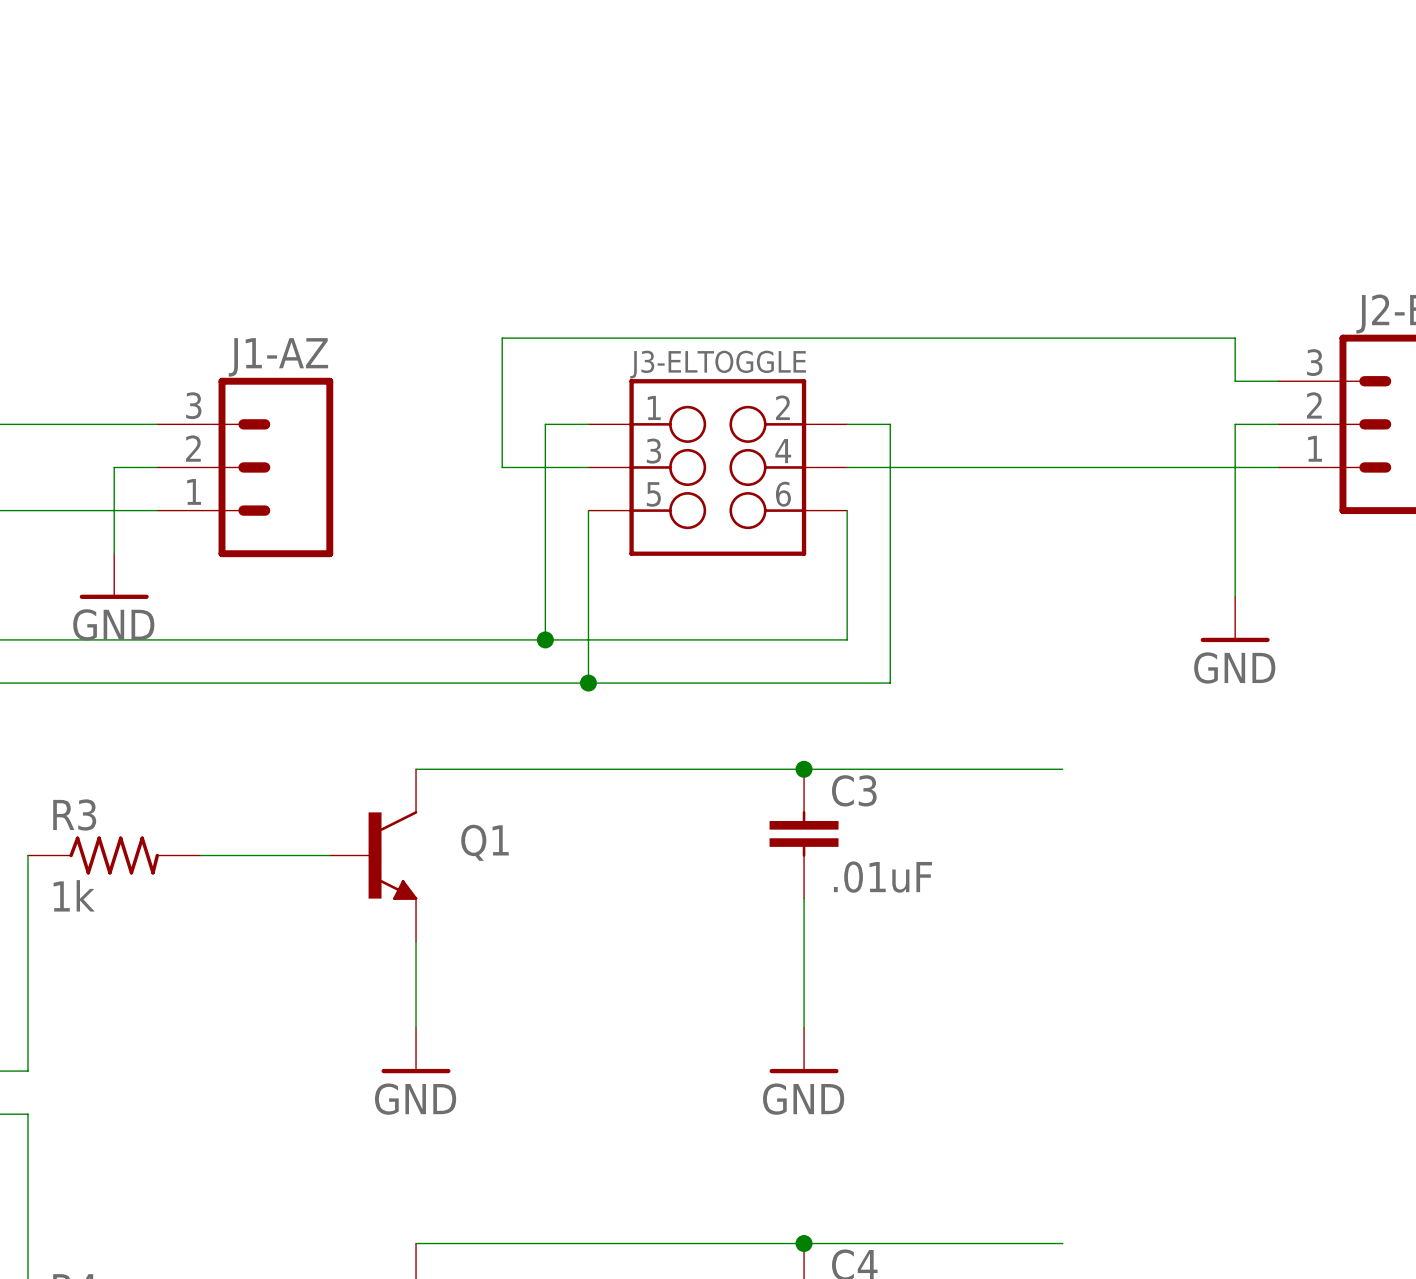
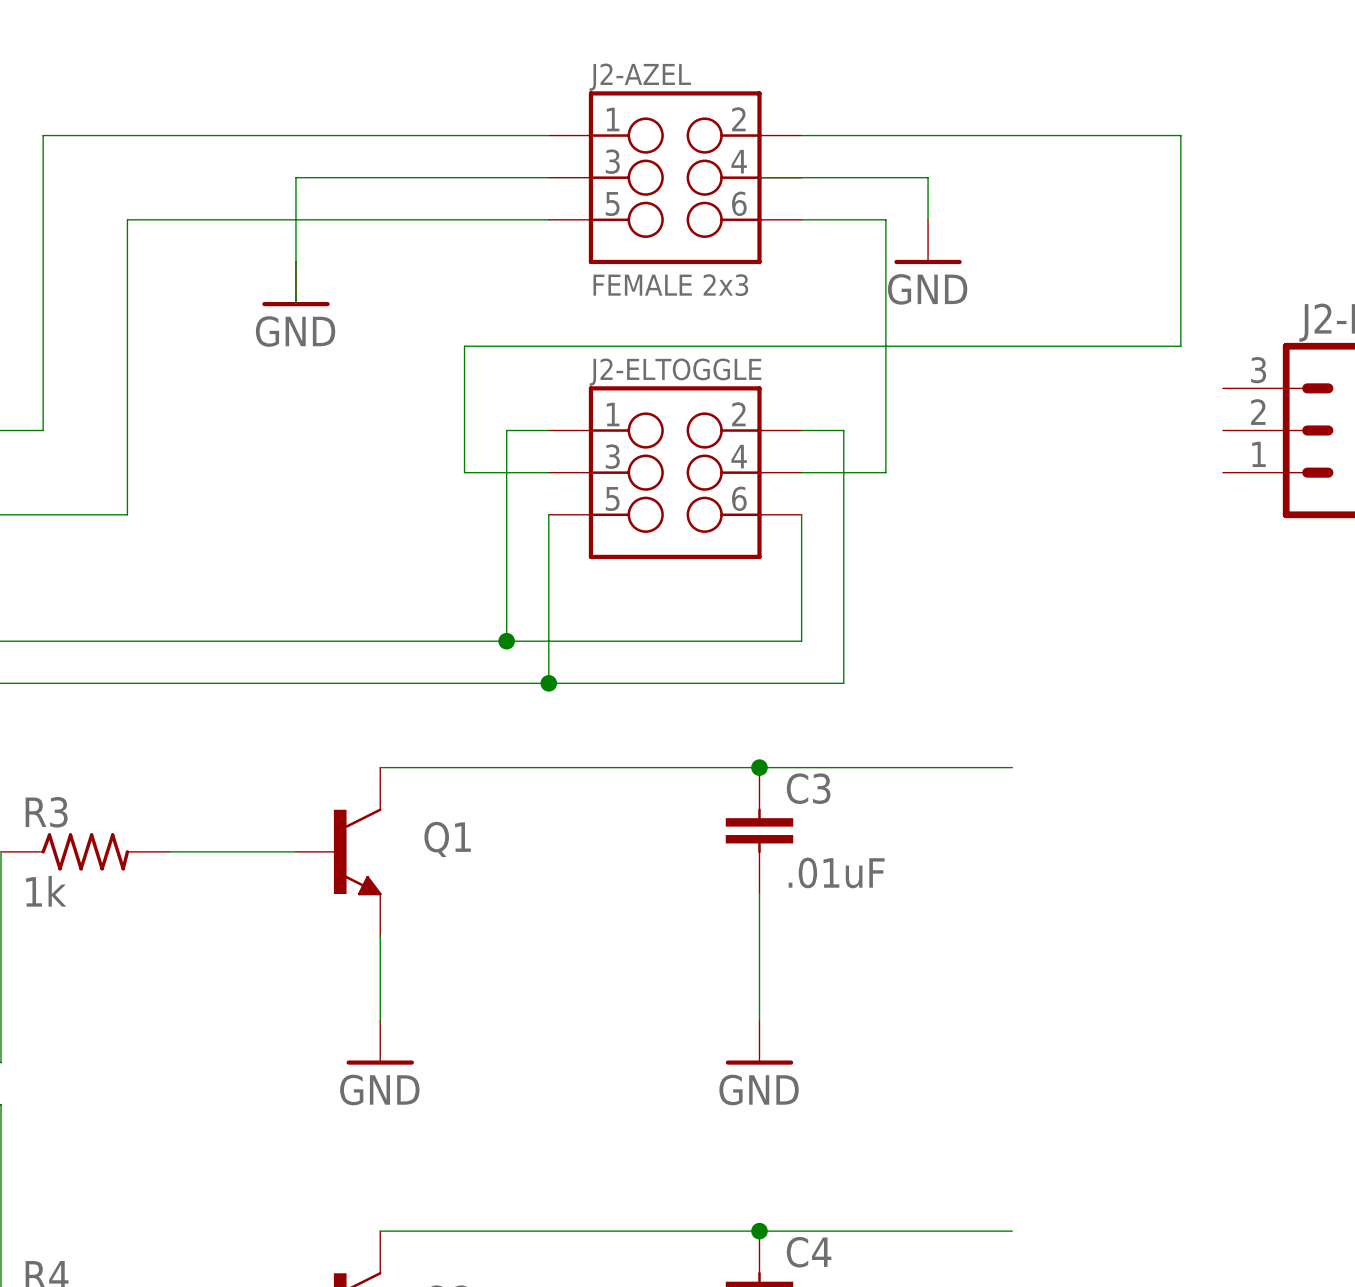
wire: none -> (548, 177) (295, 177) (295, 304)
J2-AZEL: none -> FEMALE 2x3 (675, 177)
wire: none -> (759, 177) (928, 177) (928, 219)
wire: none -> (548, 219) (127, 219) (127, 514)
power symbol: none -> GND (928, 241)
wire: (1235, 338) (1235, 381) (1278, 381) -> (1180, 346) (1180, 135) (801, 135)
J3-ELTOGGLE name: J3-ELTOGGLE (718, 364) -> J2-ELTOGGLE (675, 372)
wire: (71, 424) (157, 424) -> (43, 430) (43, 135) (548, 135)
wire: (1278, 424) (1235, 424) (1235, 596) -> none
wire: (157, 467) (114, 467) (114, 553) -> none
J1-AZ: (245, 467) -> none
wire: (933, 467) (1278, 467) -> (885, 472) (885, 219) (801, 219)
power symbol position: GND (114, 576) -> GND (295, 284)
power symbol: GND (1235, 619) -> none

